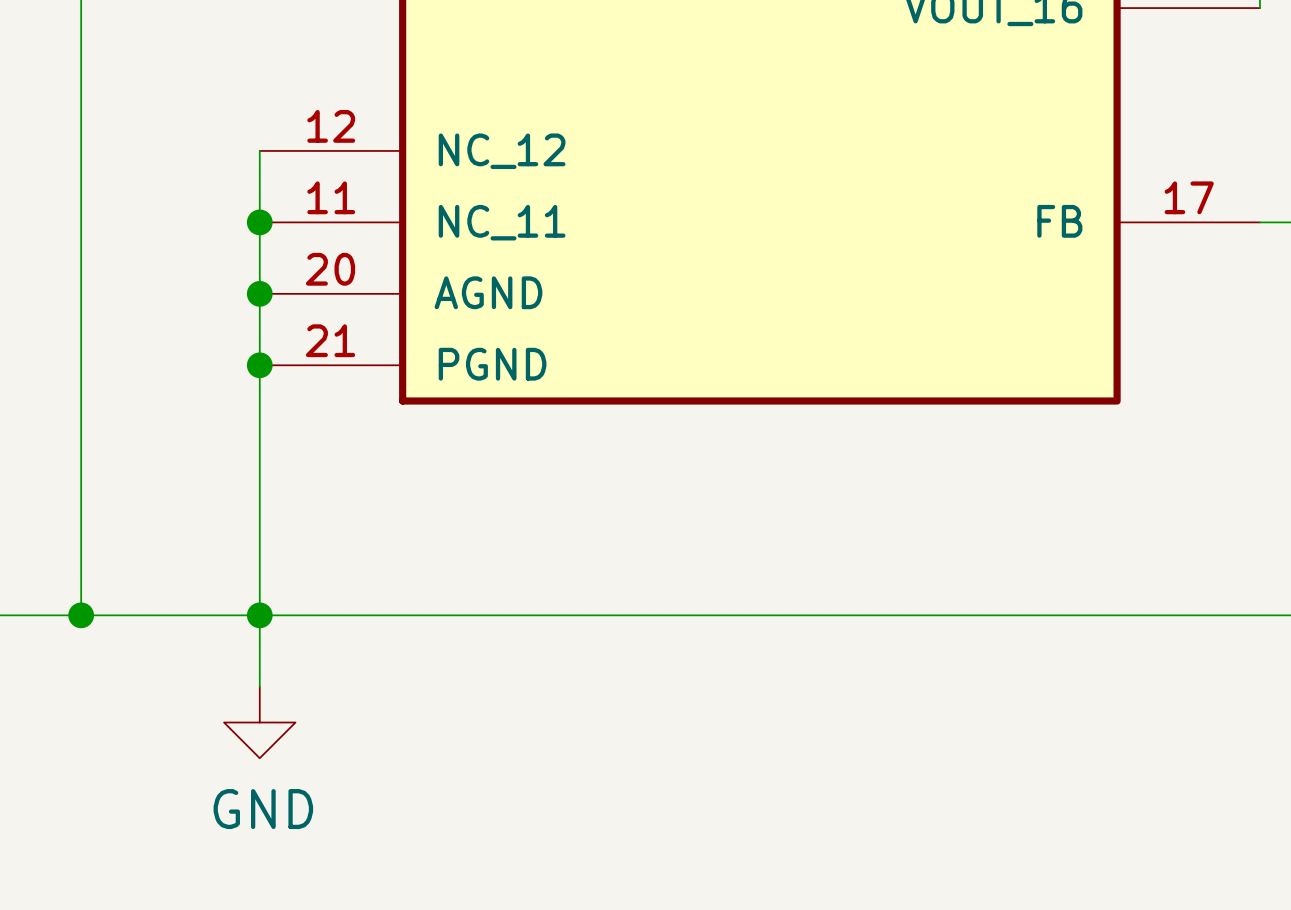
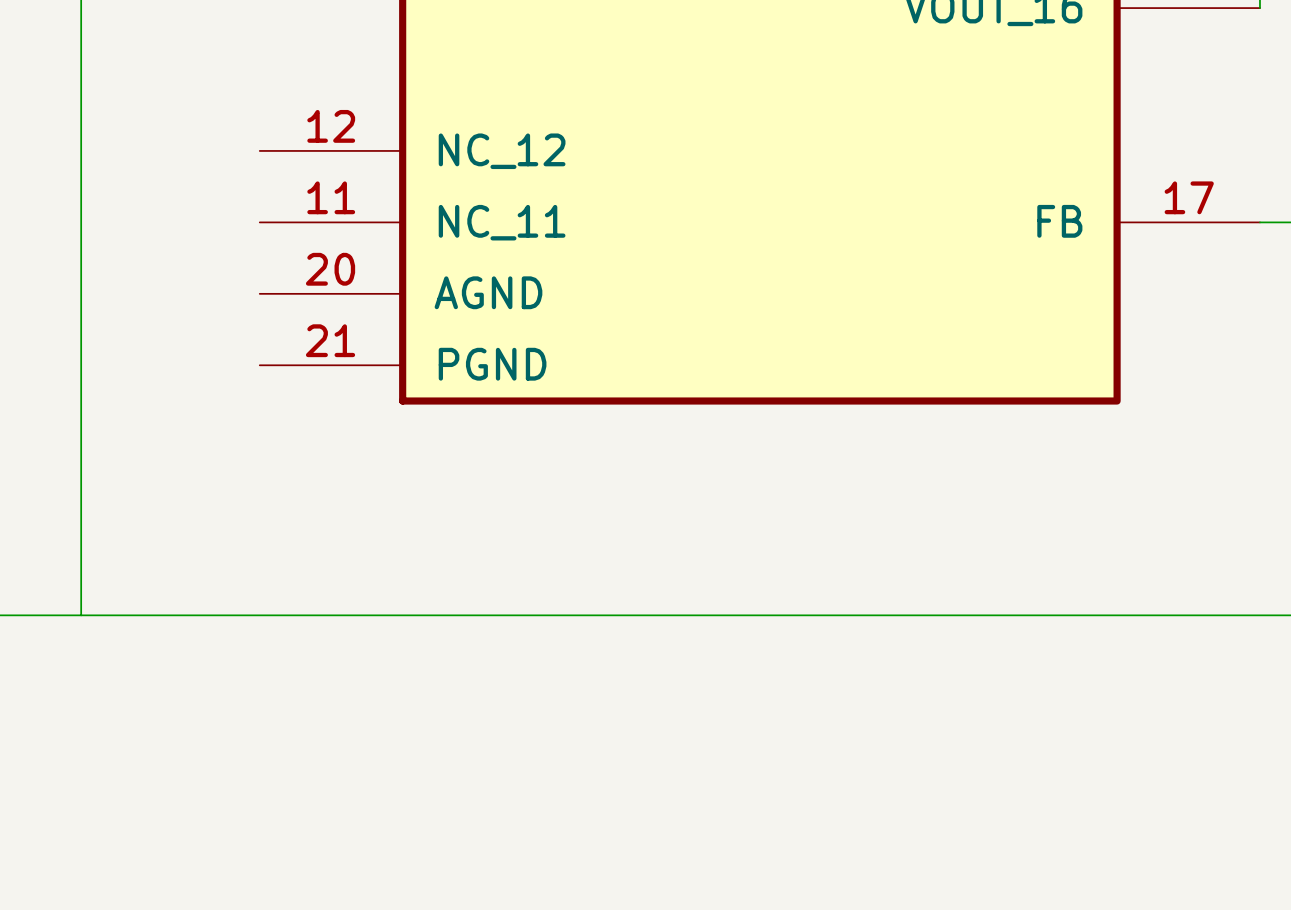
wire: (259, 150) (259, 686) -> none
junction: (259, 222) -> none
junction: (259, 293) -> none
junction: (259, 365) -> none
junction: (81, 615) -> none
junction: (259, 615) -> none
power symbol: GND (259, 722) -> none

